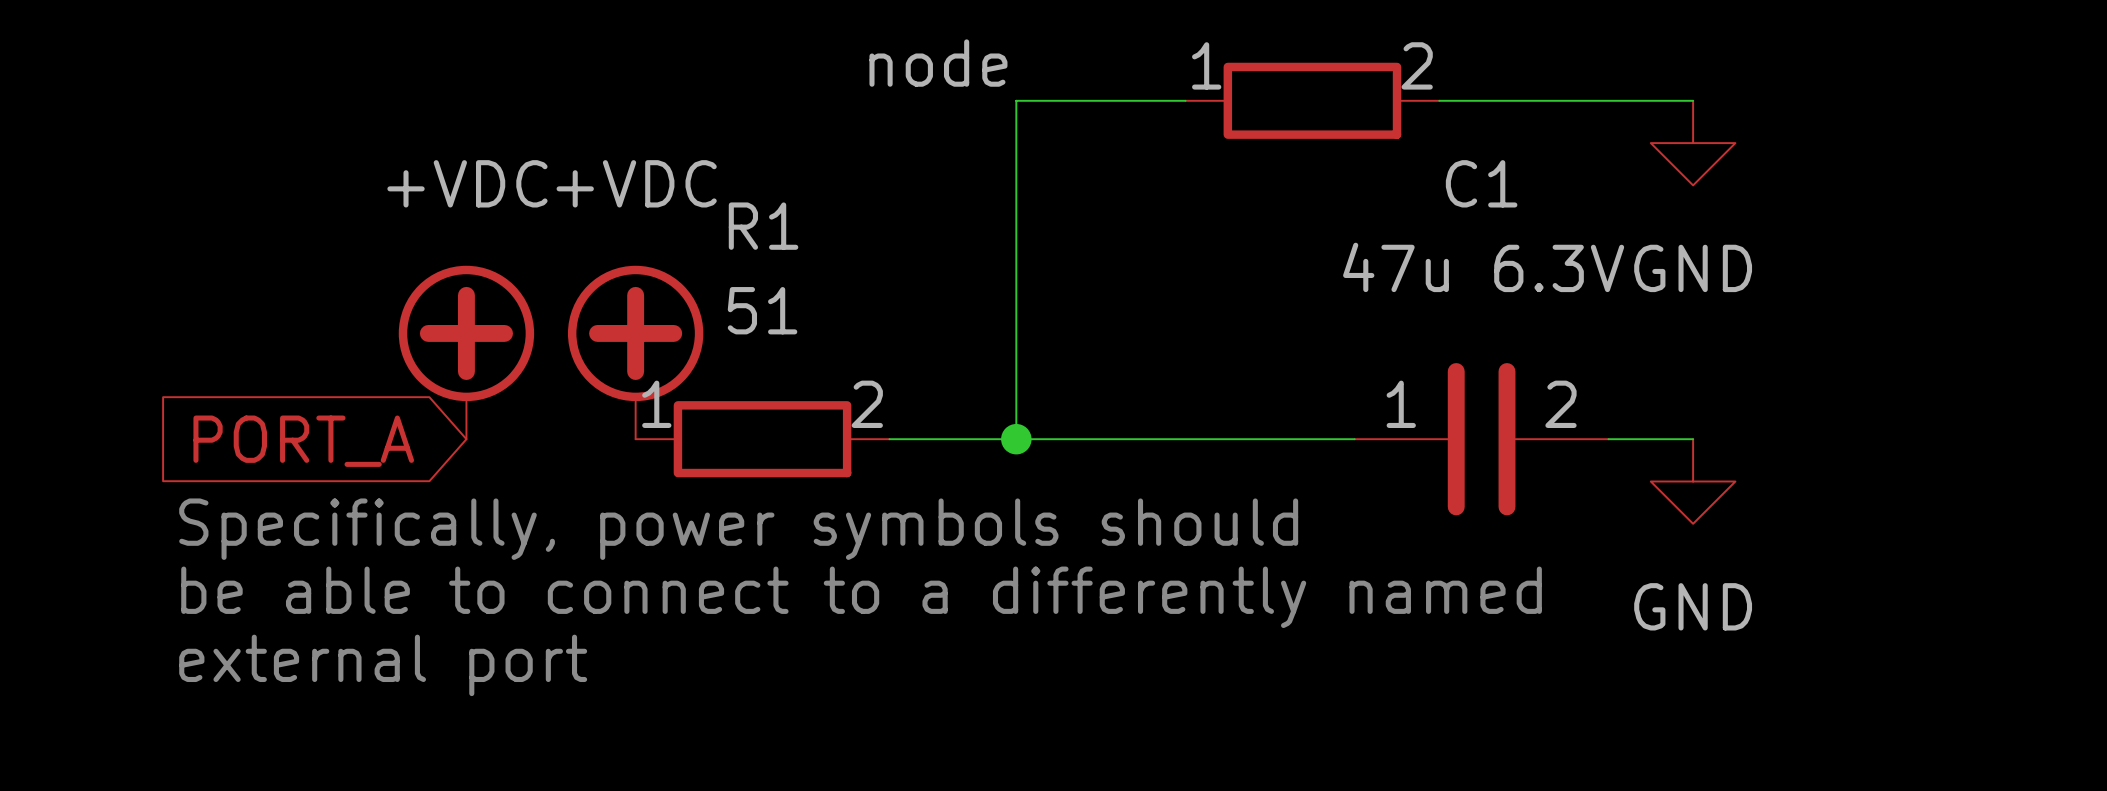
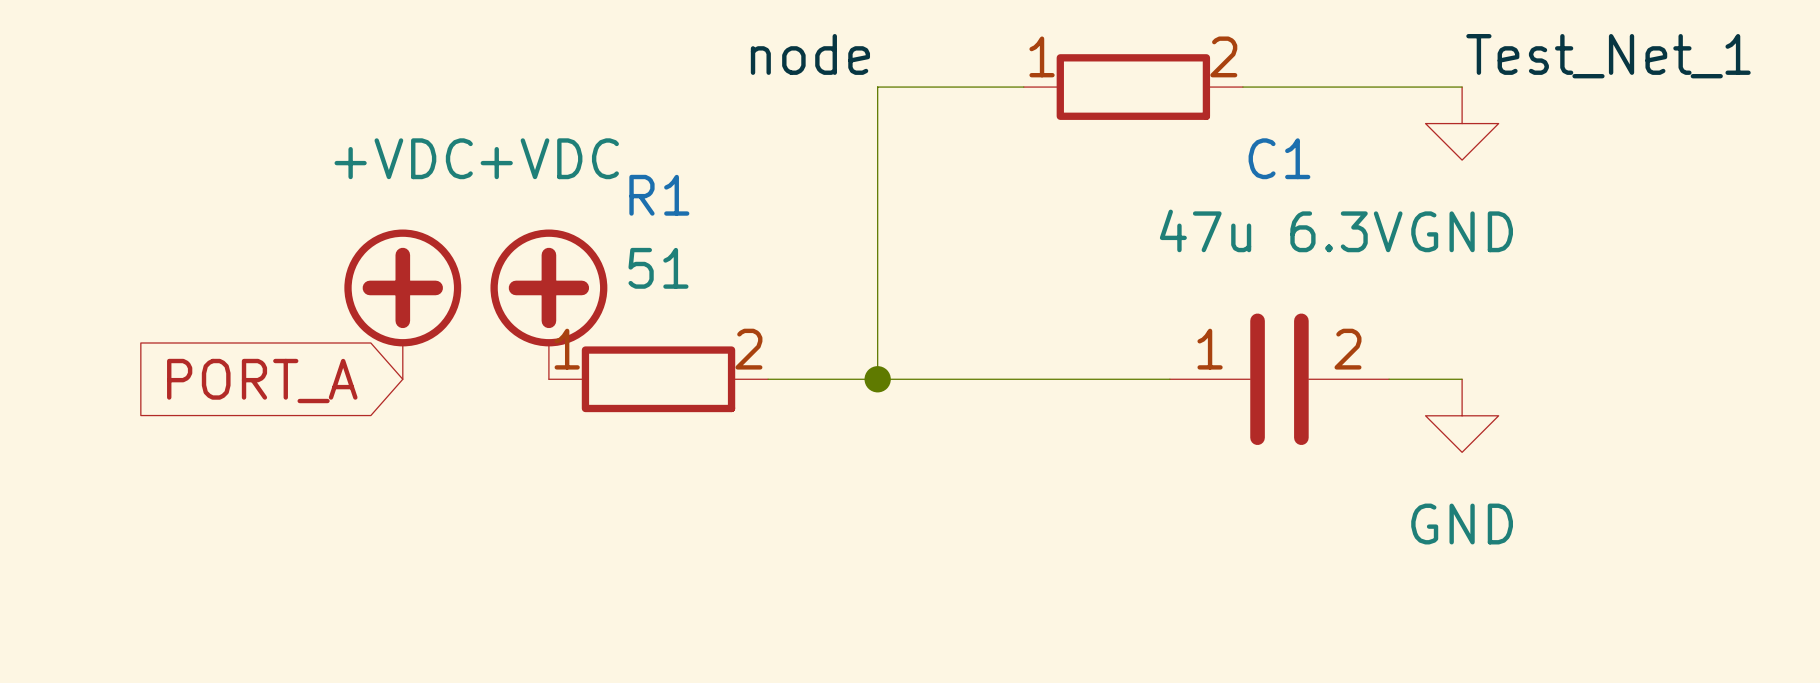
label: none -> Test_Net_1 (1608, 56)
text: Specifically, power symbols should (738, 529) -> none
text: be able to connect to a differently named (861, 597) -> none
text: external port (383, 665) -> none

